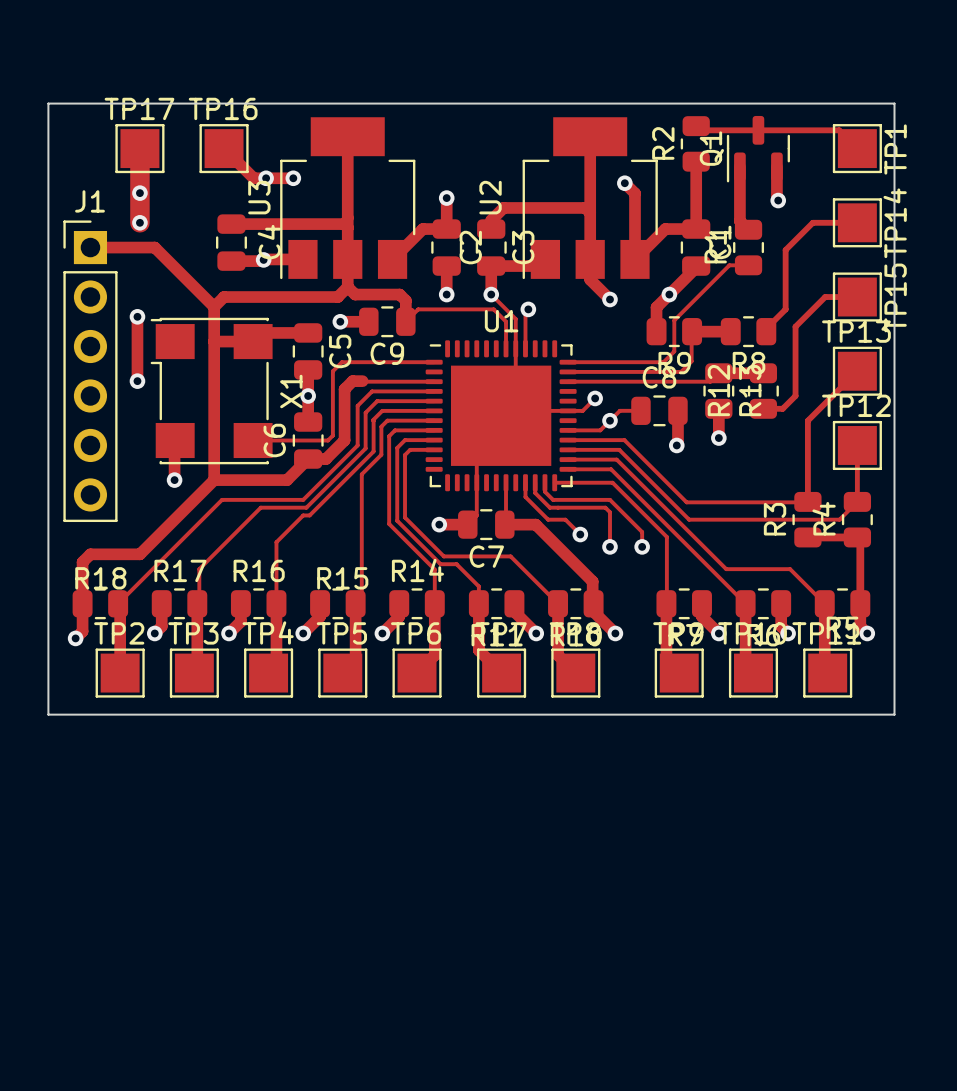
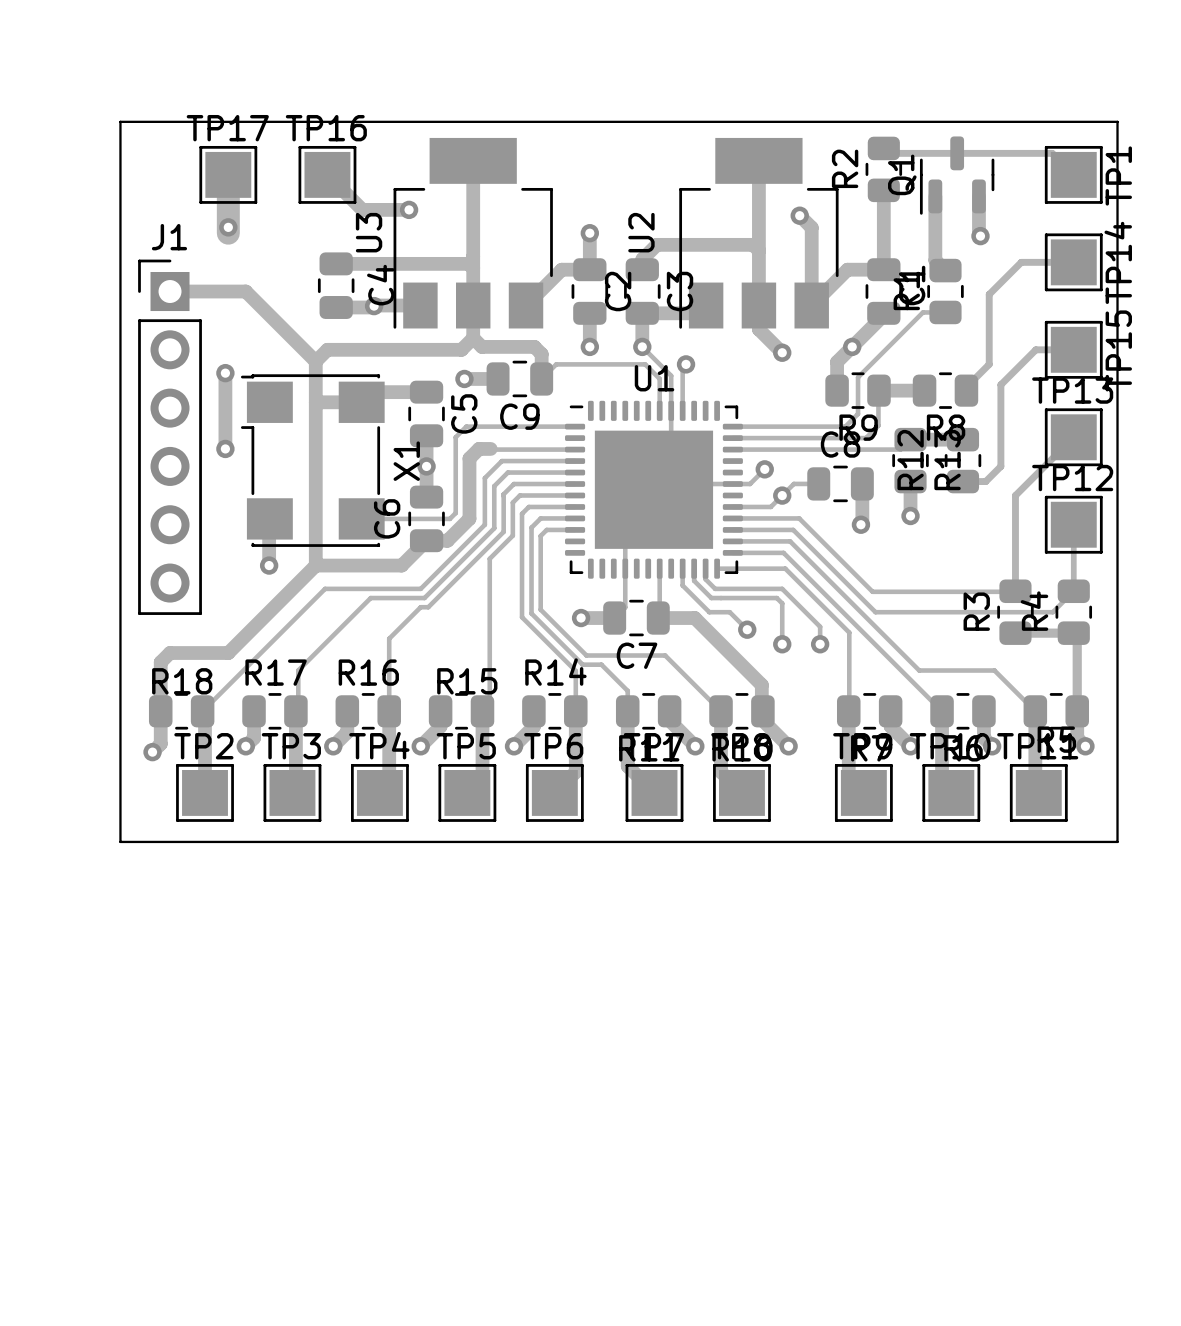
via: (266, 178) -> none
track: (139, 198) (139, 222) -> none
via: (139, 222) -> none

